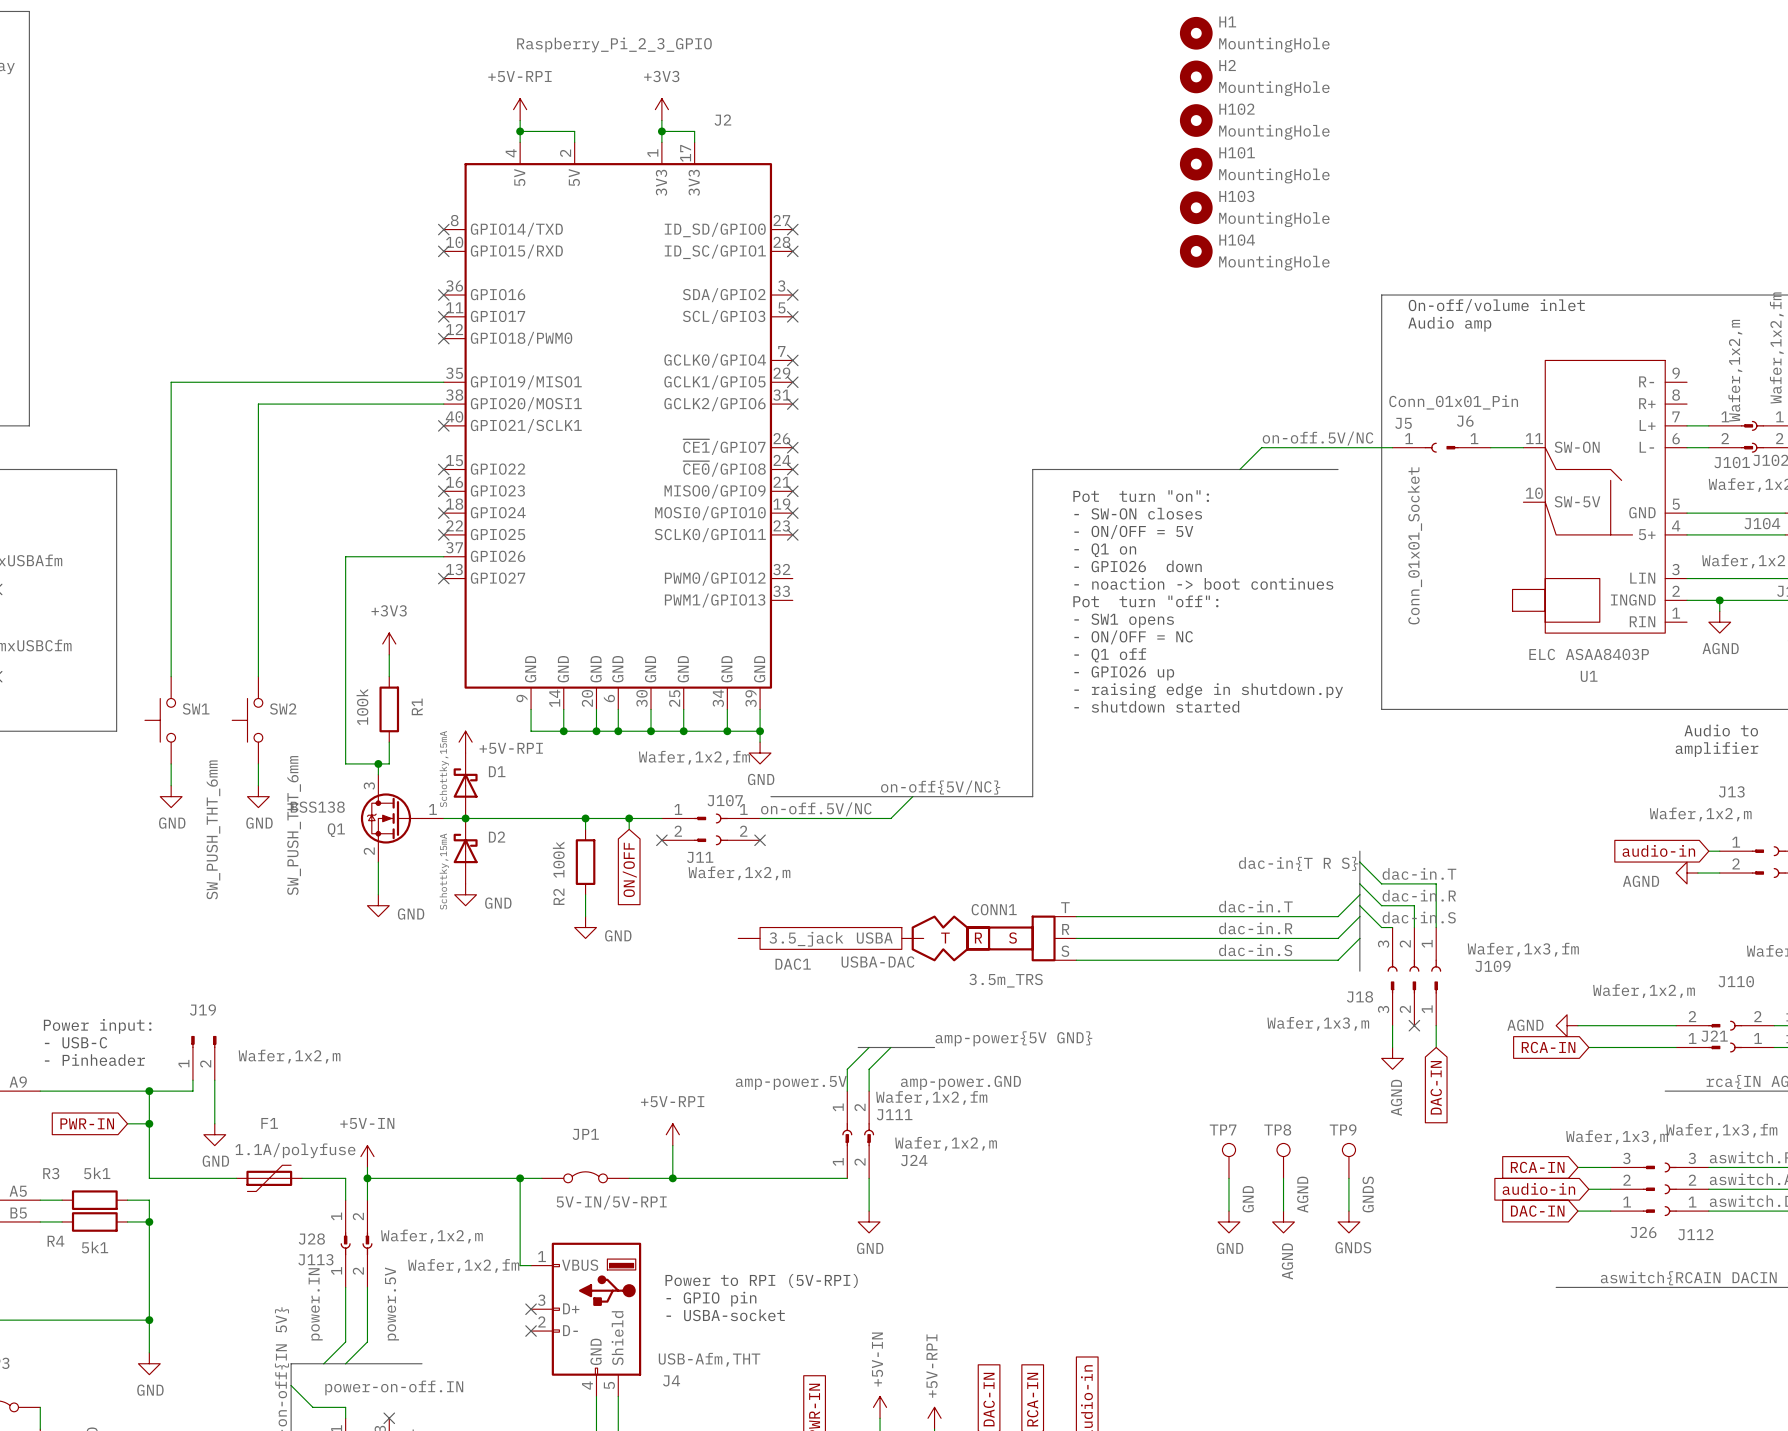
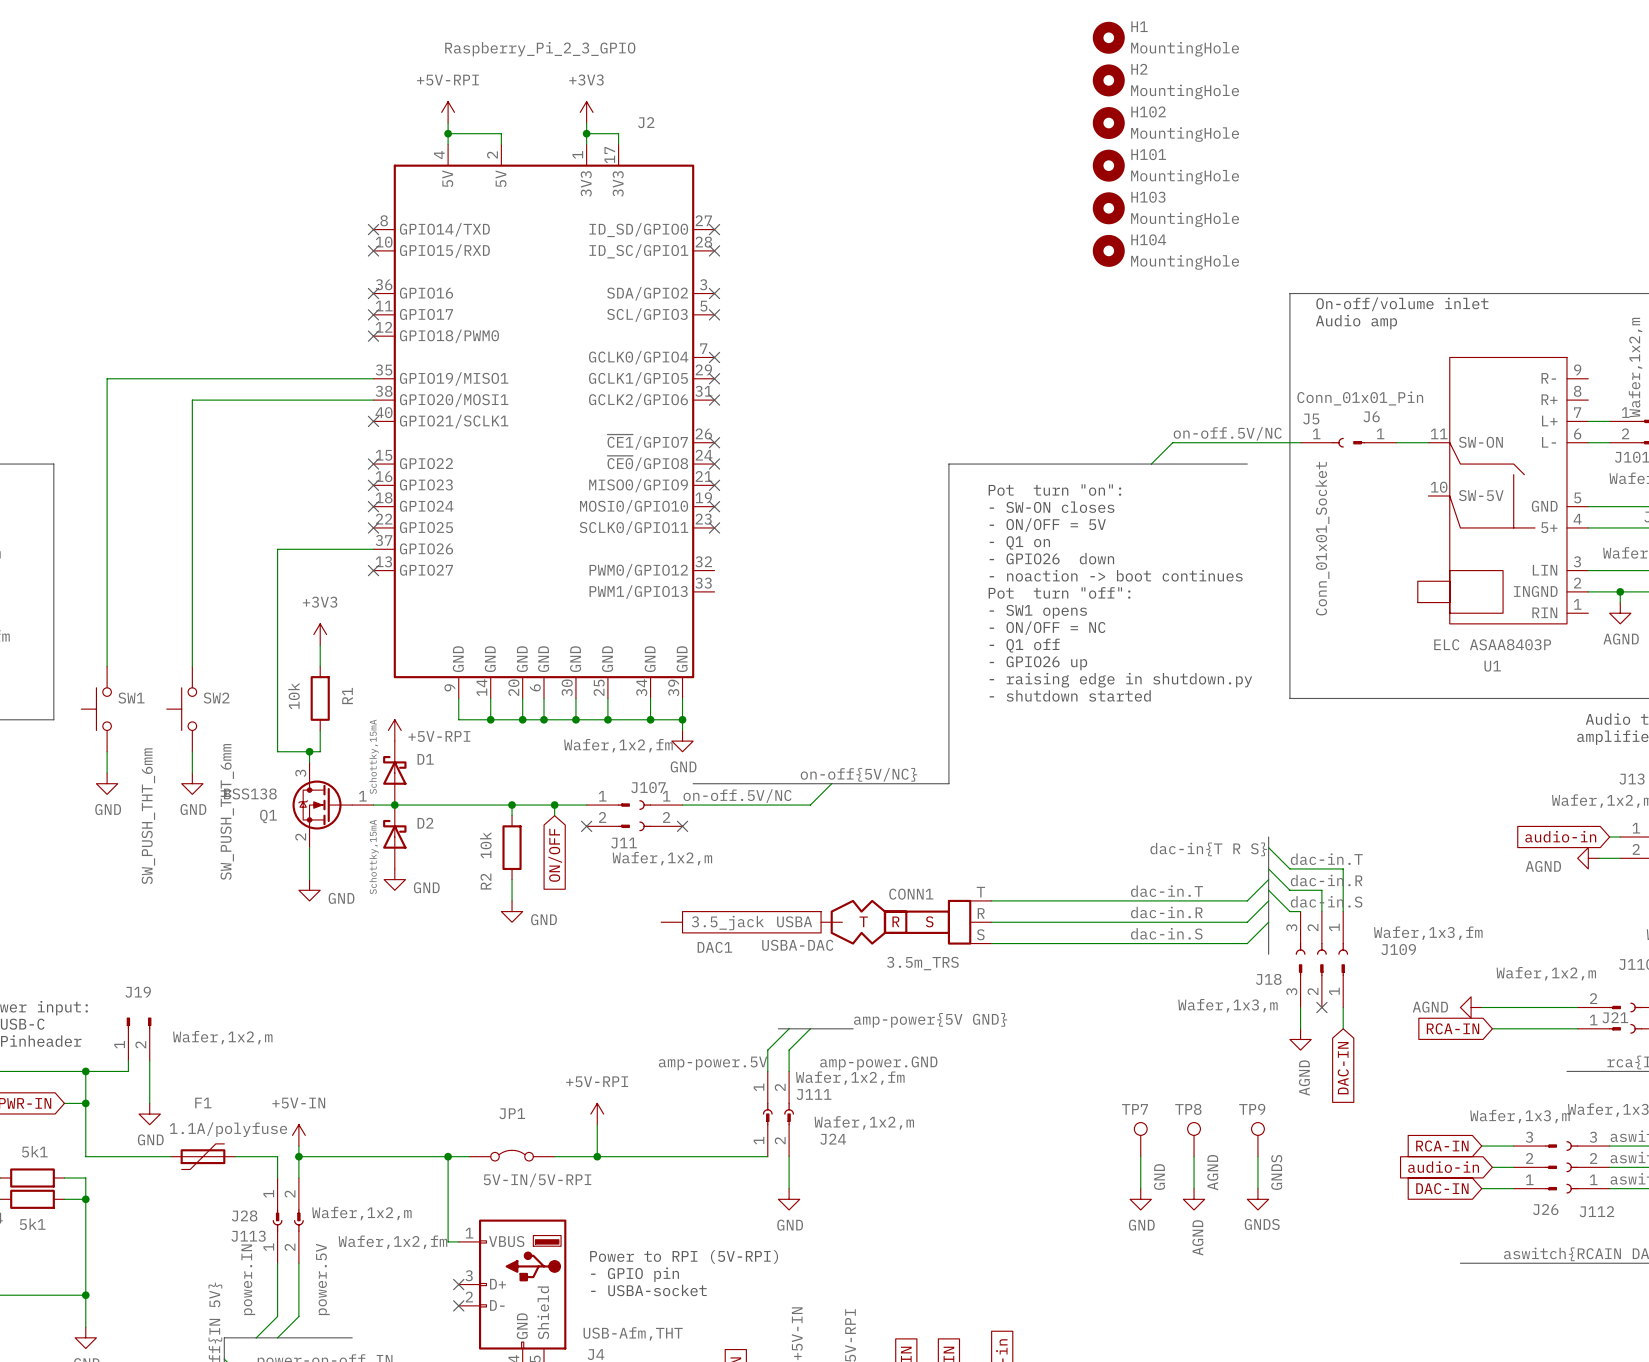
R1 value: 100k (362, 707) -> 10k (294, 696)
R2 value: 100k (558, 859) -> 10k (485, 845)

